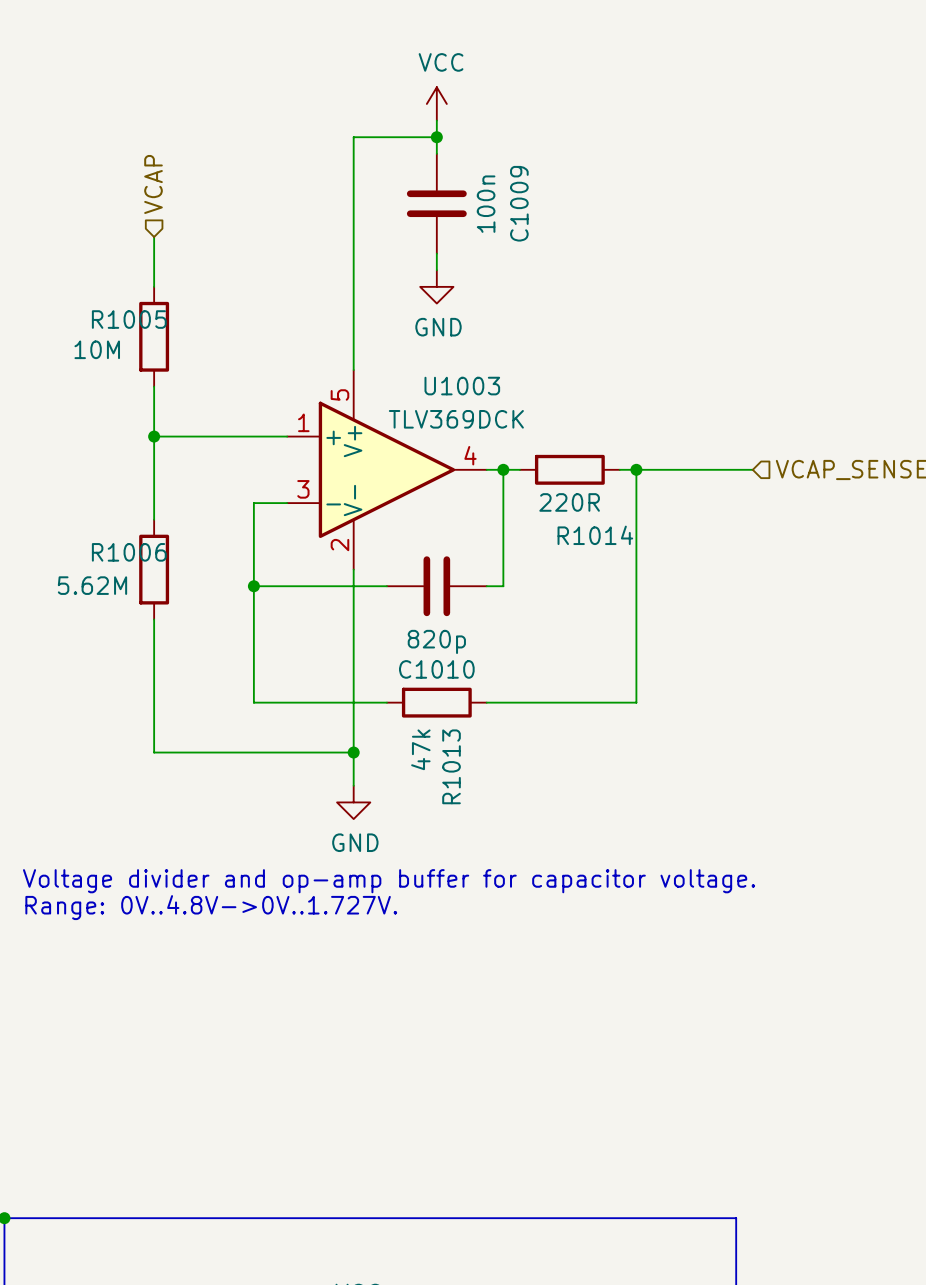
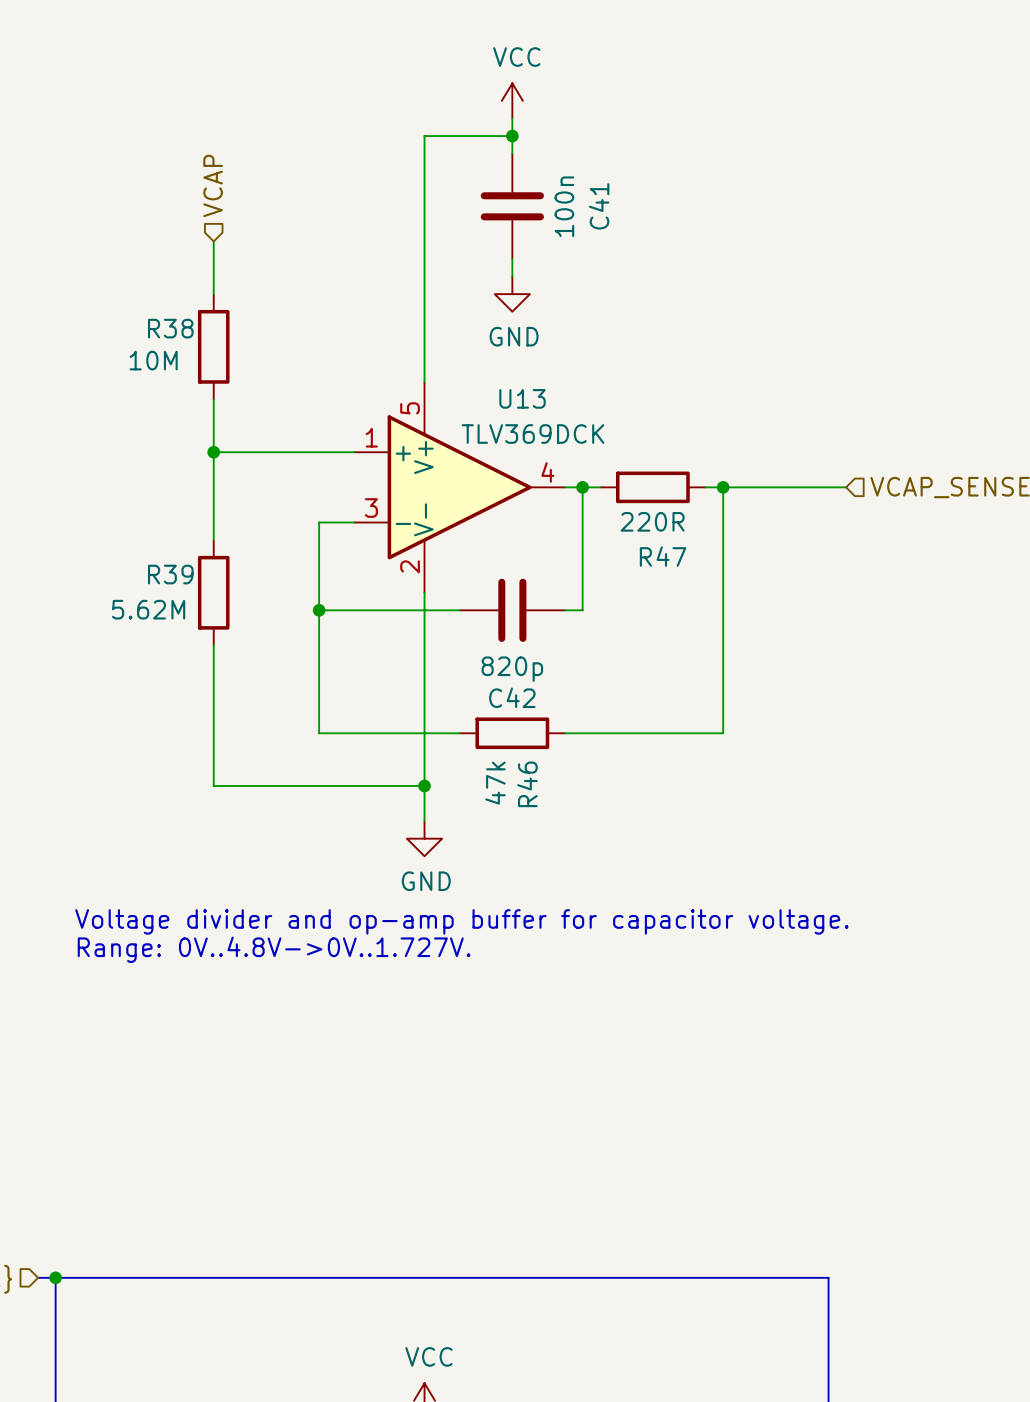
C1009 name: C1009 (519, 203) -> C41 (599, 206)
R1005 name: R1005 (129, 319) -> R38 (170, 328)
U1003 name: U1003 (462, 386) -> U13 (522, 398)
R1014 name: R1014 (595, 535) -> R47 (663, 556)
R1006 name: R1006 (129, 552) -> R39 (170, 574)
C1010 name: C1010 (436, 669) -> C42 (512, 697)
R1013 name: R1013 (451, 766) -> R46 (527, 784)

